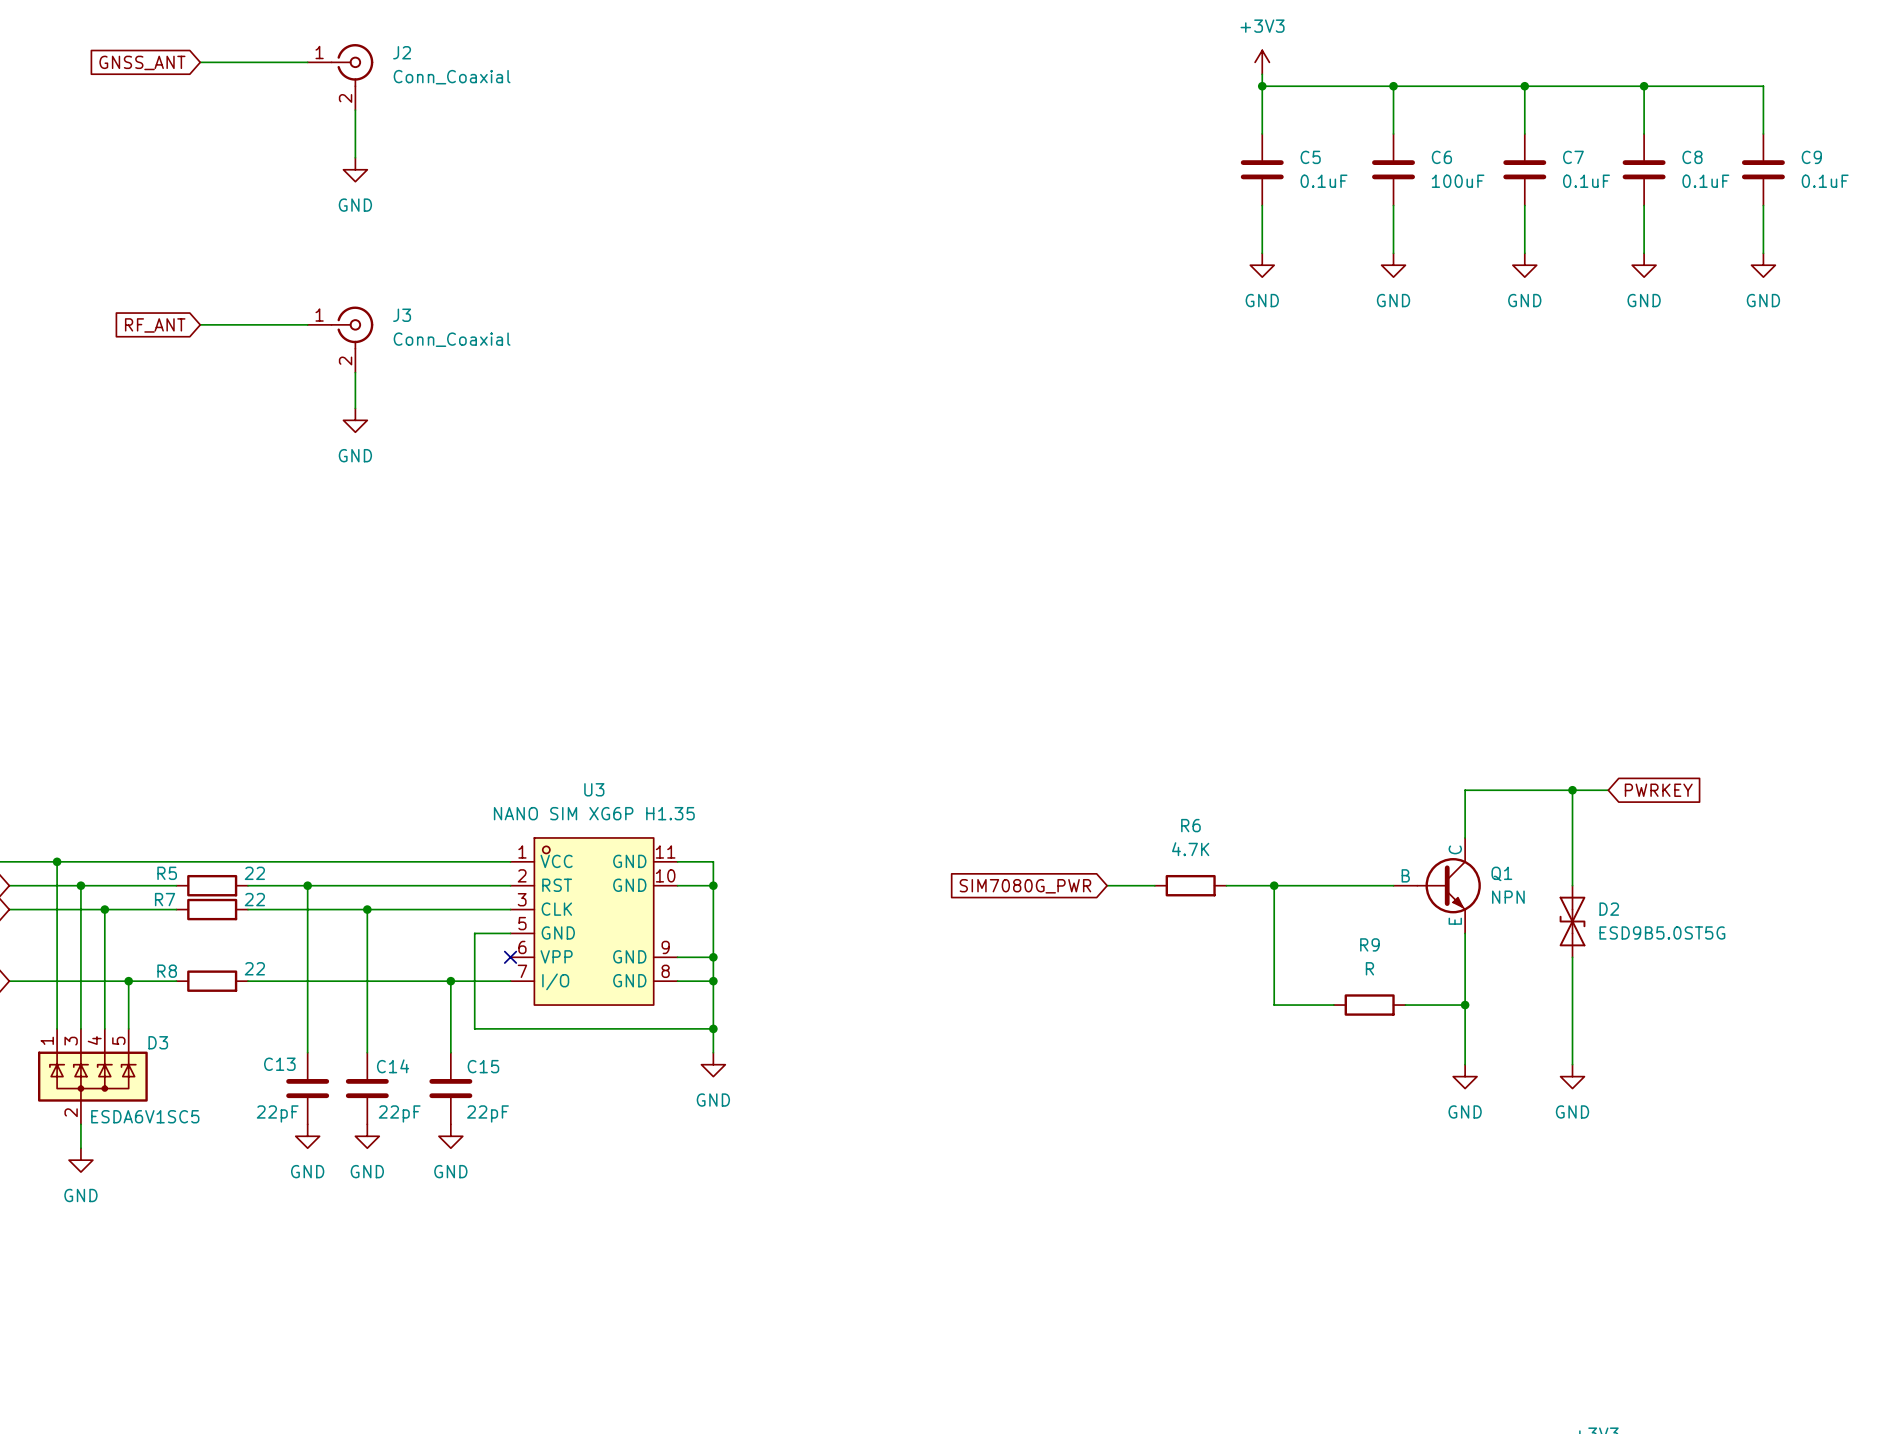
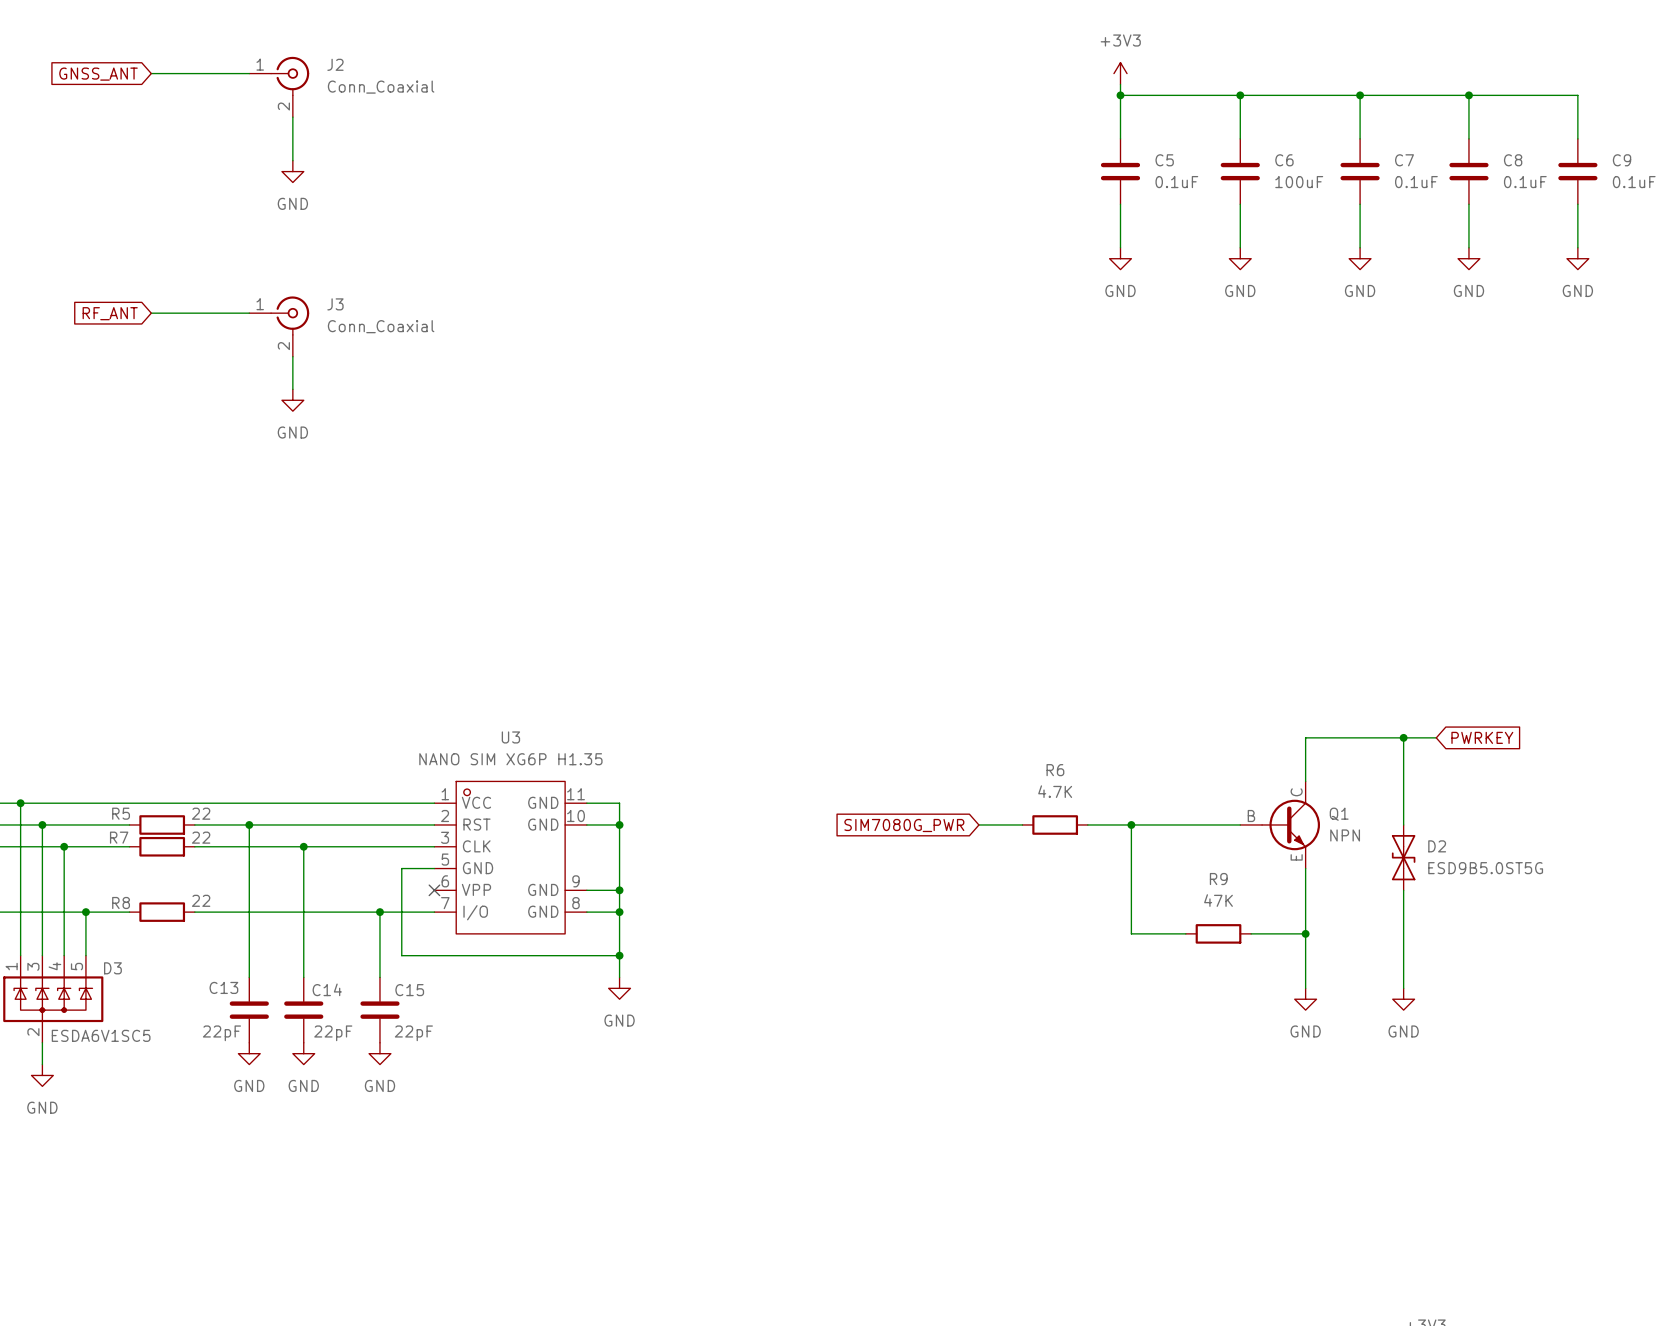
R9 value: R (1369, 968) -> 47K (1218, 900)

